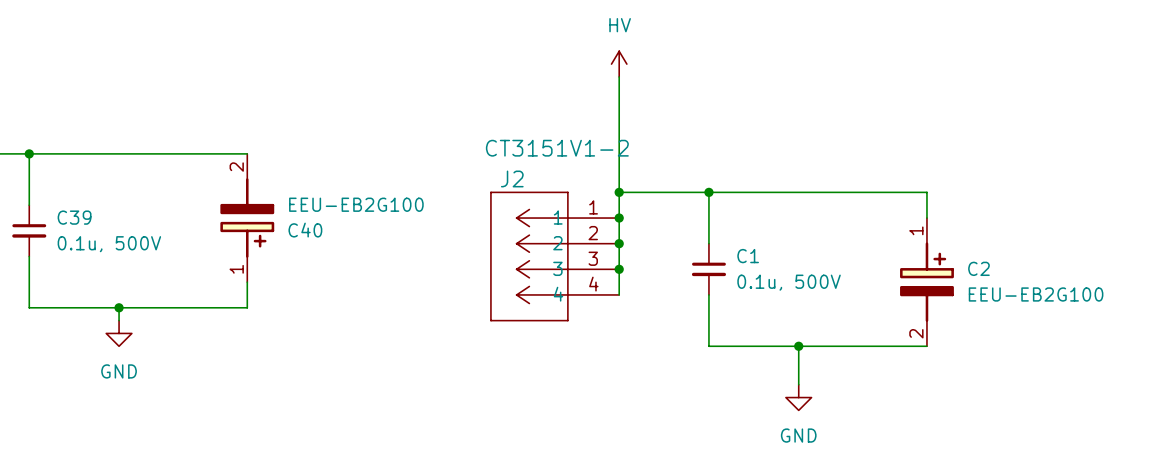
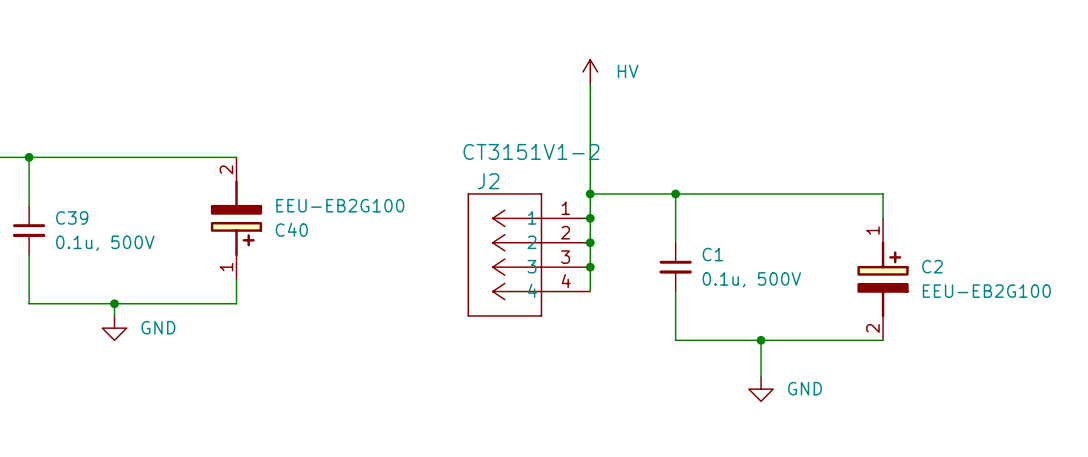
power symbol text position: HV (620, 25) -> HV (628, 71)
power symbol text position: GND (119, 371) -> GND (158, 327)
power symbol text position: GND (798, 435) -> GND (804, 388)

